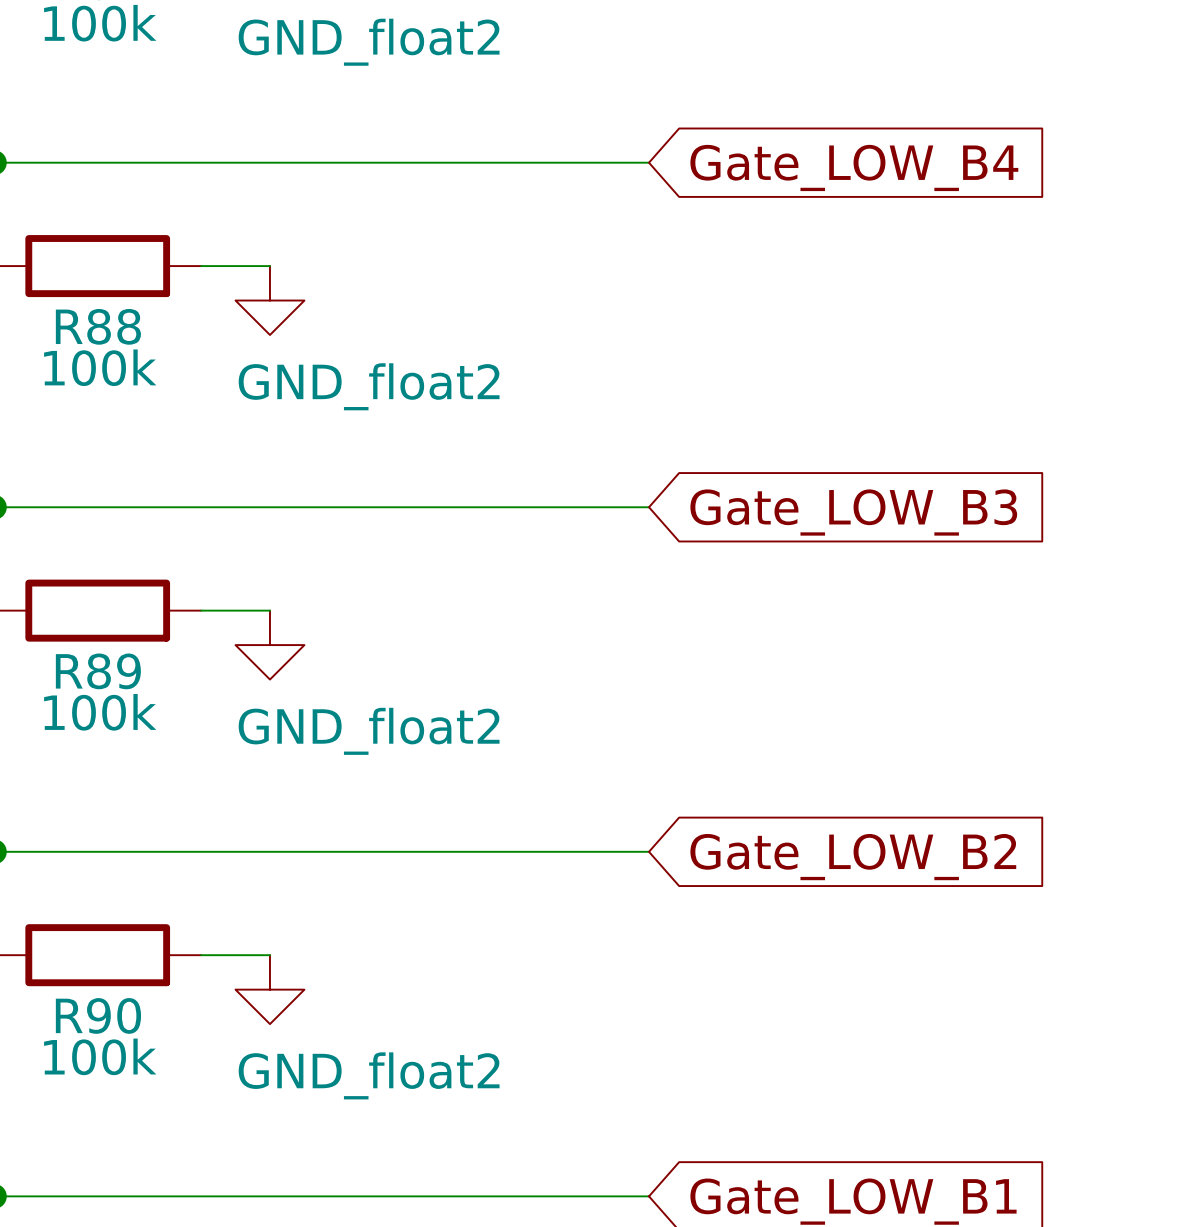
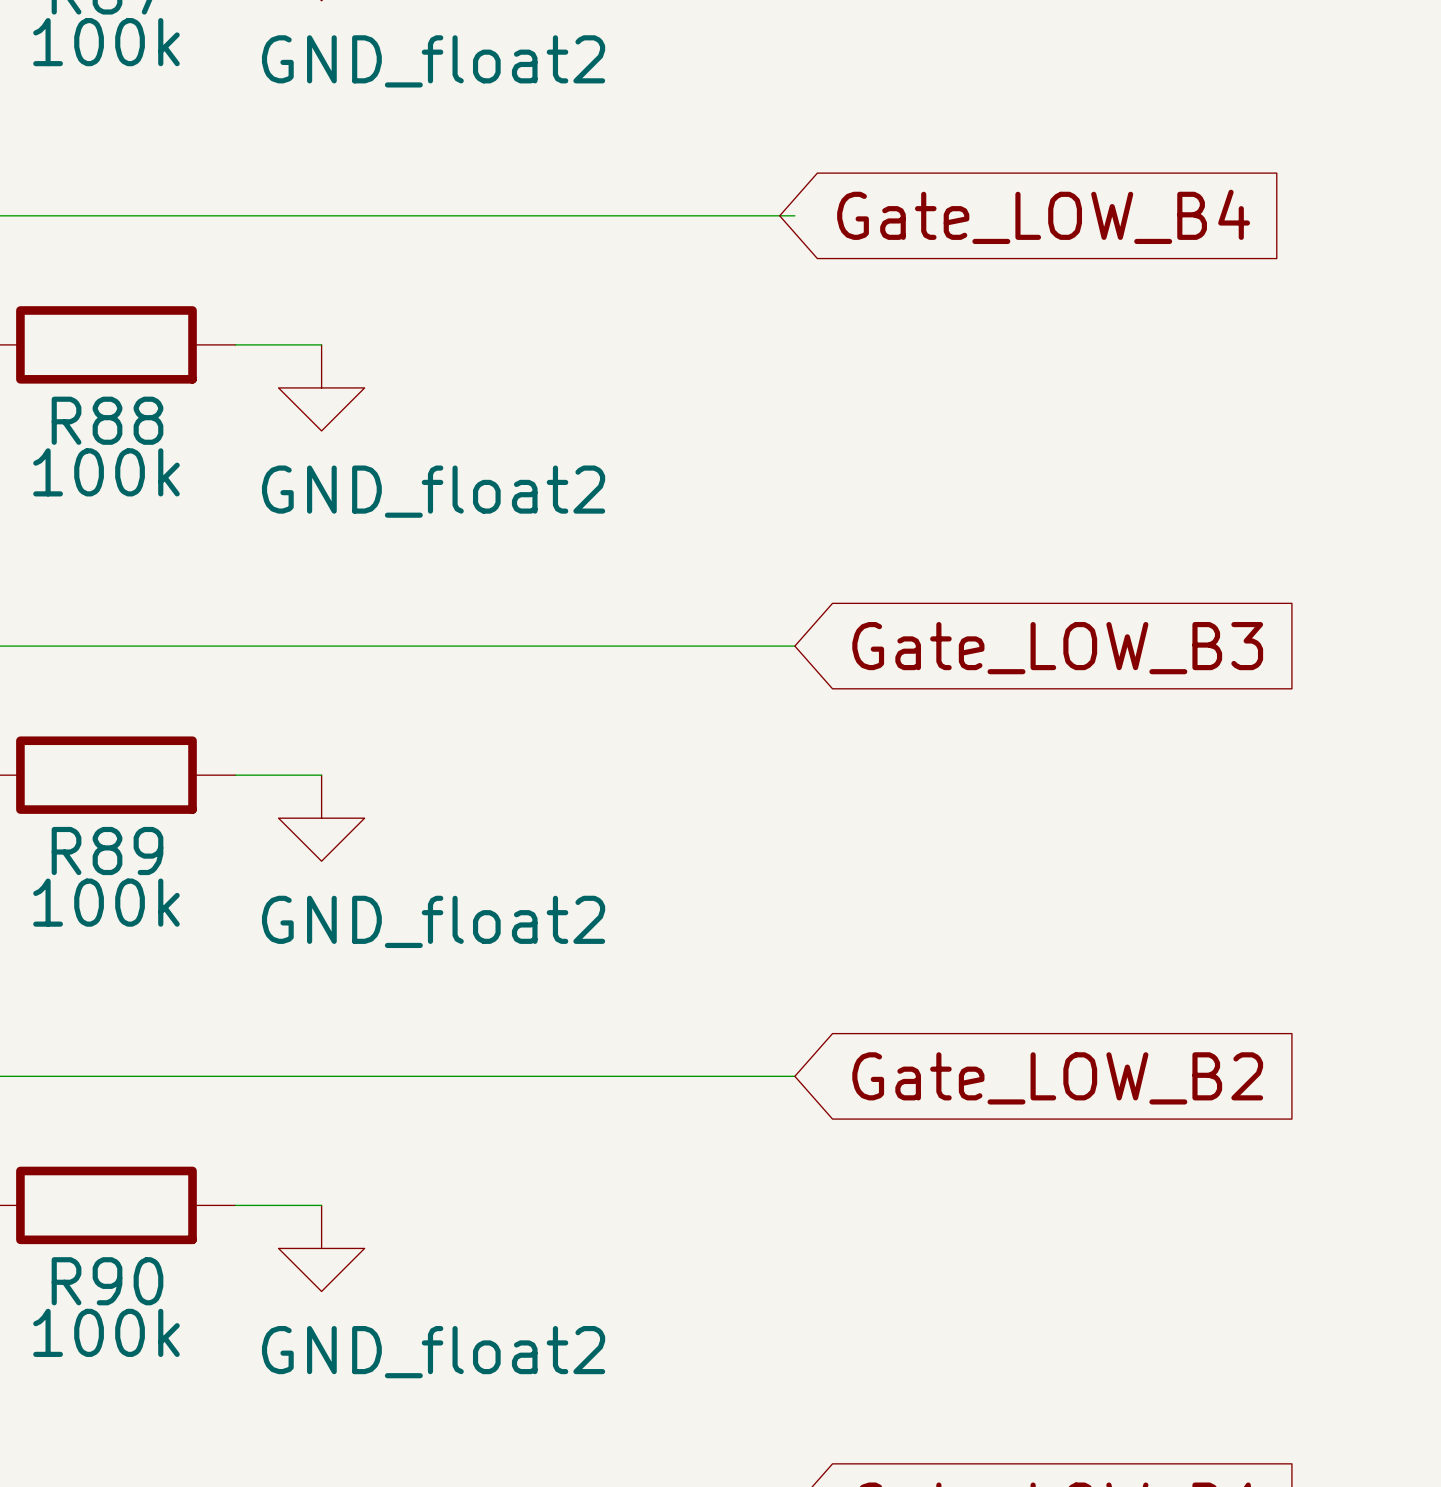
global label position: Gate_LOW_B4 (854, 167) -> Gate_LOW_B4 (1043, 216)

